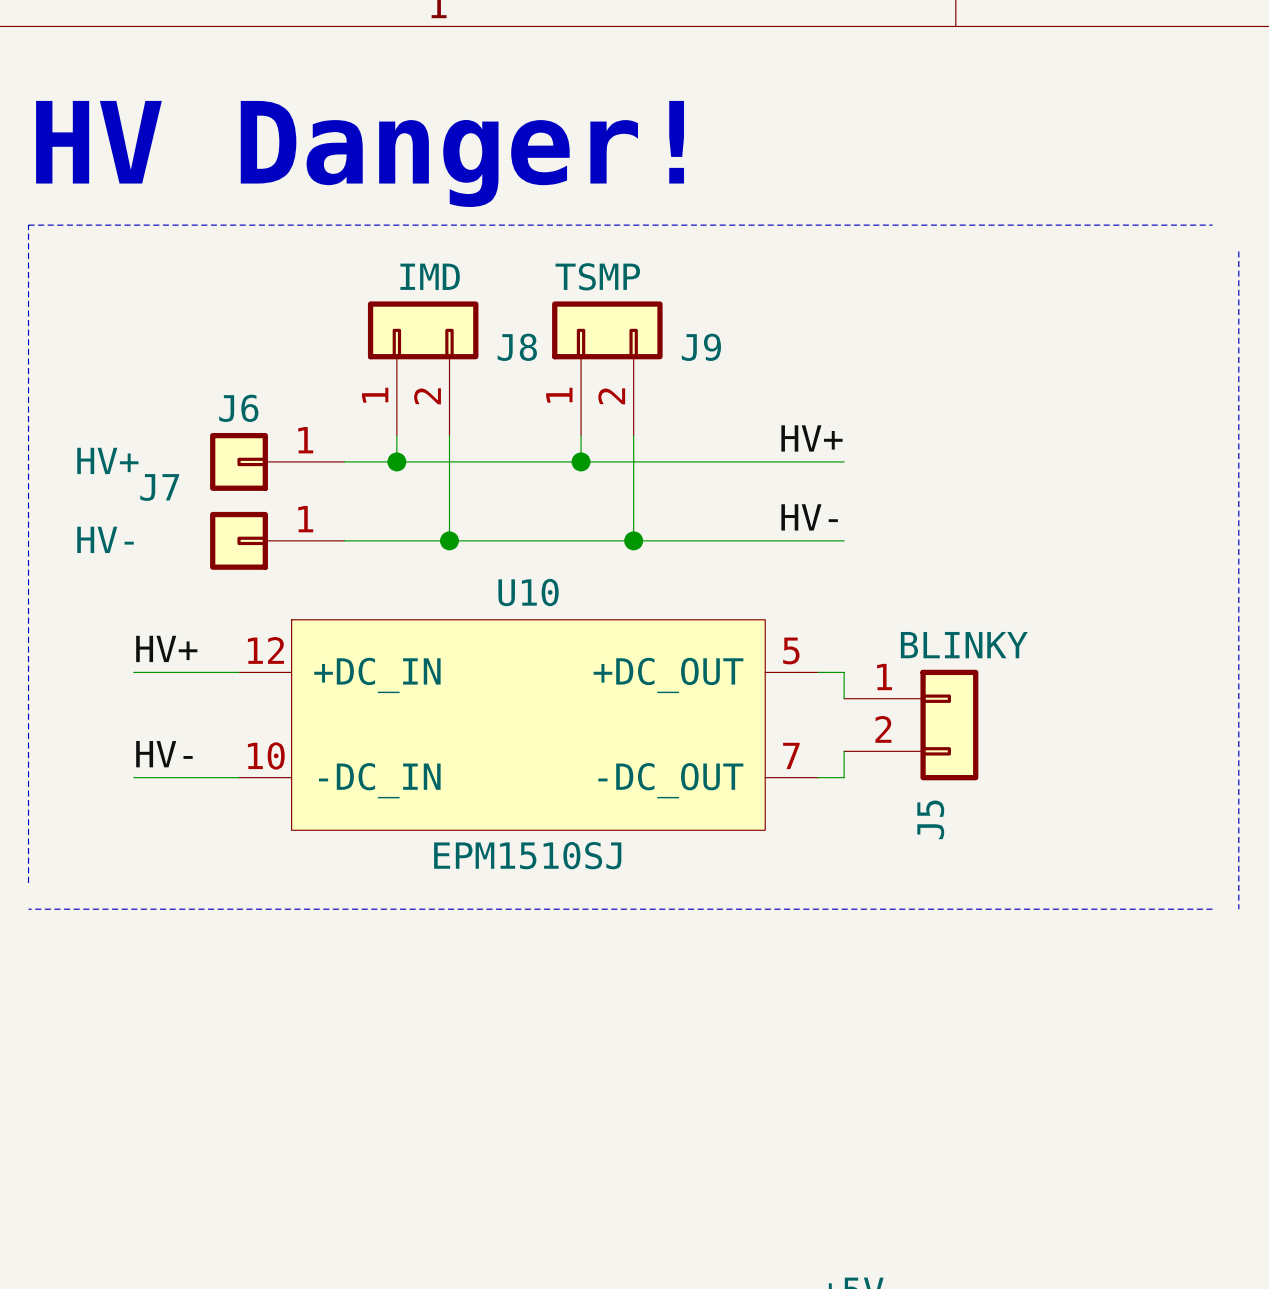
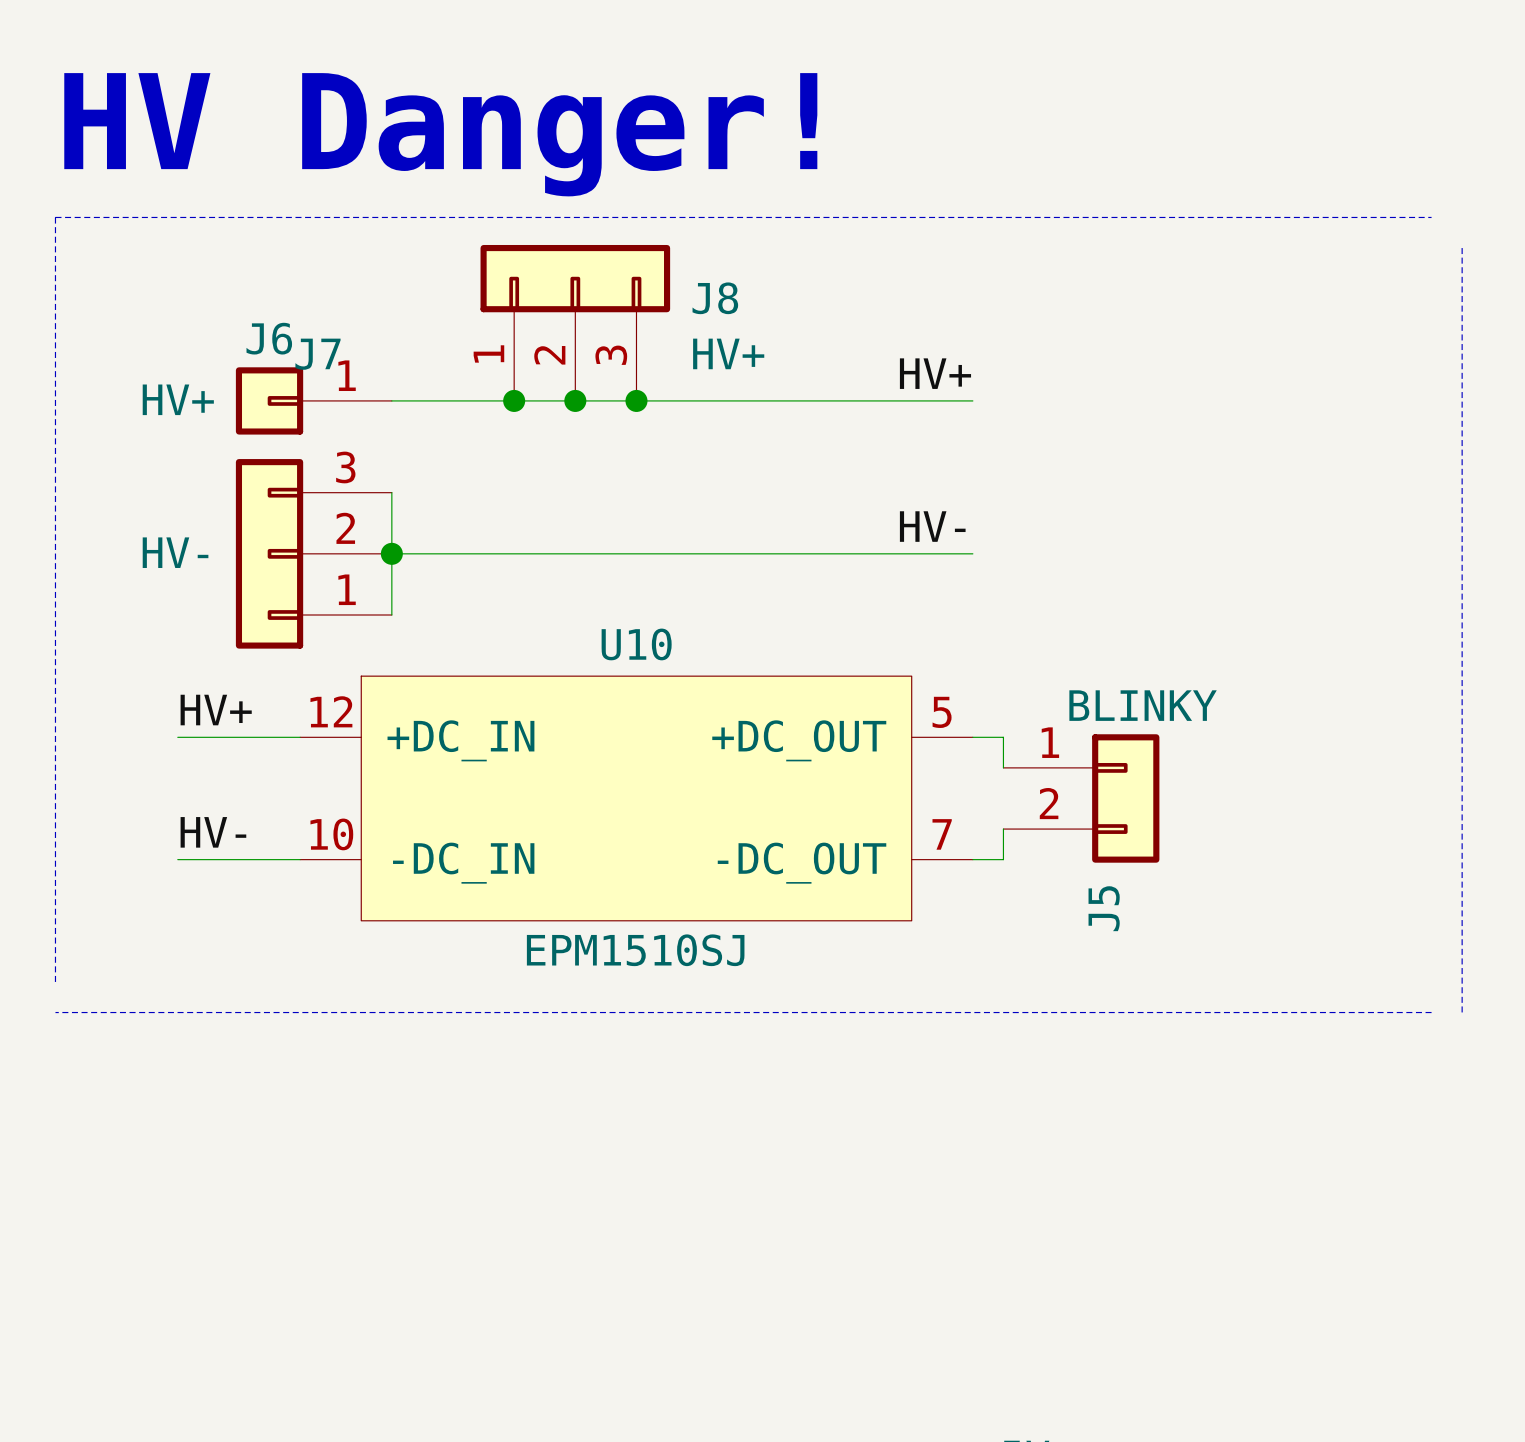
J8 value: IMD (430, 276) -> HV+ (728, 353)
J8 symbol: [367, 301, 479, 436] -> [480, 244, 671, 401]
J9: TSMP (607, 368) -> none
junction: none -> (514, 400)
junction: none -> (575, 400)
junction: none -> (636, 400)
wire: (396, 435) (396, 461) -> none
wire: (449, 435) (449, 540) -> (391, 492) (391, 615)
wire: (581, 435) (581, 461) -> none
wire: (633, 435) (633, 540) -> none
label position: HV+ (811, 438) -> HV+ (935, 373)
J6 value position: HV+ (107, 460) -> HV+ (178, 399)
J6 position: (277, 461) -> (313, 400)
wire: (344, 461) (844, 461) -> (391, 400) (972, 400)
junction: (396, 461) -> none
junction: (581, 461) -> none
J7 name position: J7 (159, 487) -> J7 (318, 354)
J7 symbol: [210, 511, 345, 570] -> [235, 459, 392, 649]
junction: none -> (391, 553)
label position: HV- (809, 517) -> HV- (932, 526)
J7 value position: HV- (105, 539) -> HV- (175, 552)
wire: (344, 540) (844, 540) -> (391, 553) (972, 553)
junction: (449, 540) -> none
junction: (633, 540) -> none

